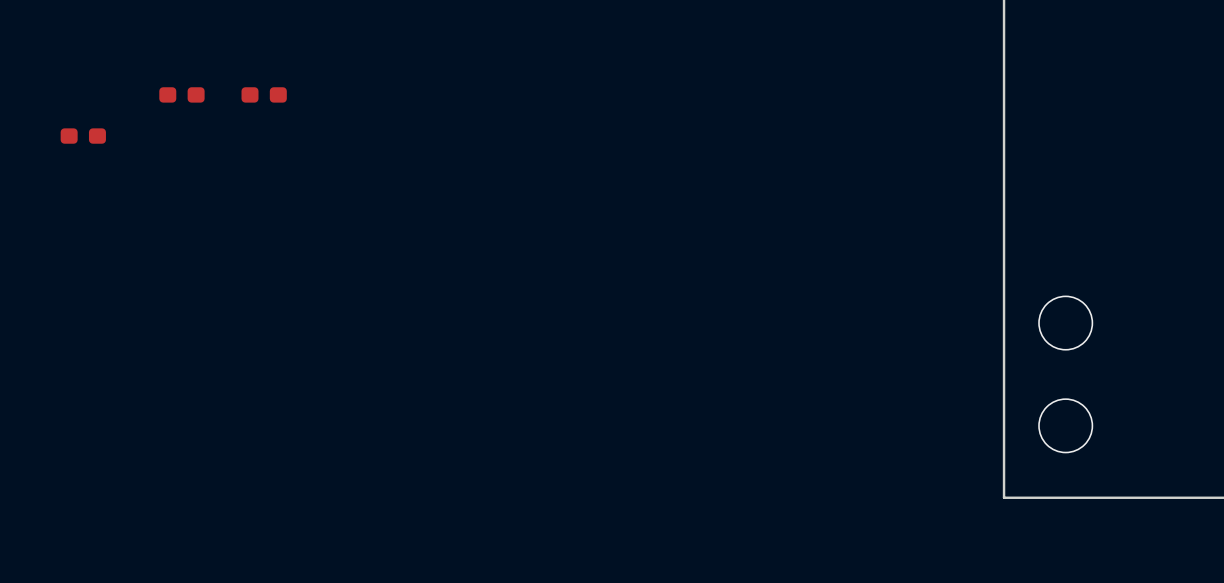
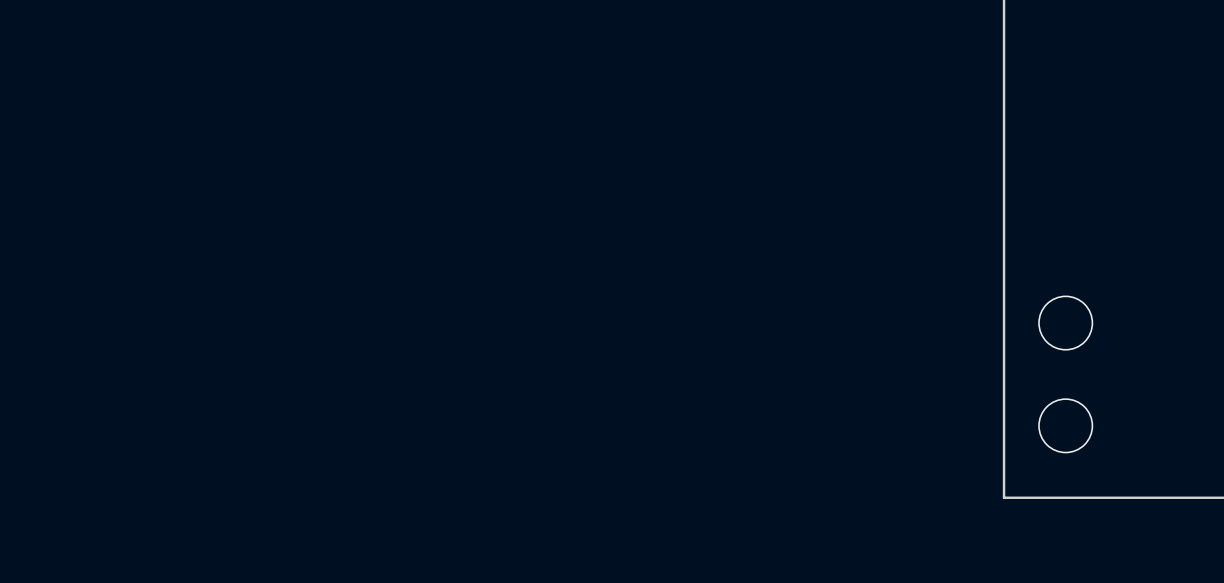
part: (181, 94) -> none
part: (264, 94) -> none
part: (83, 136) -> none

